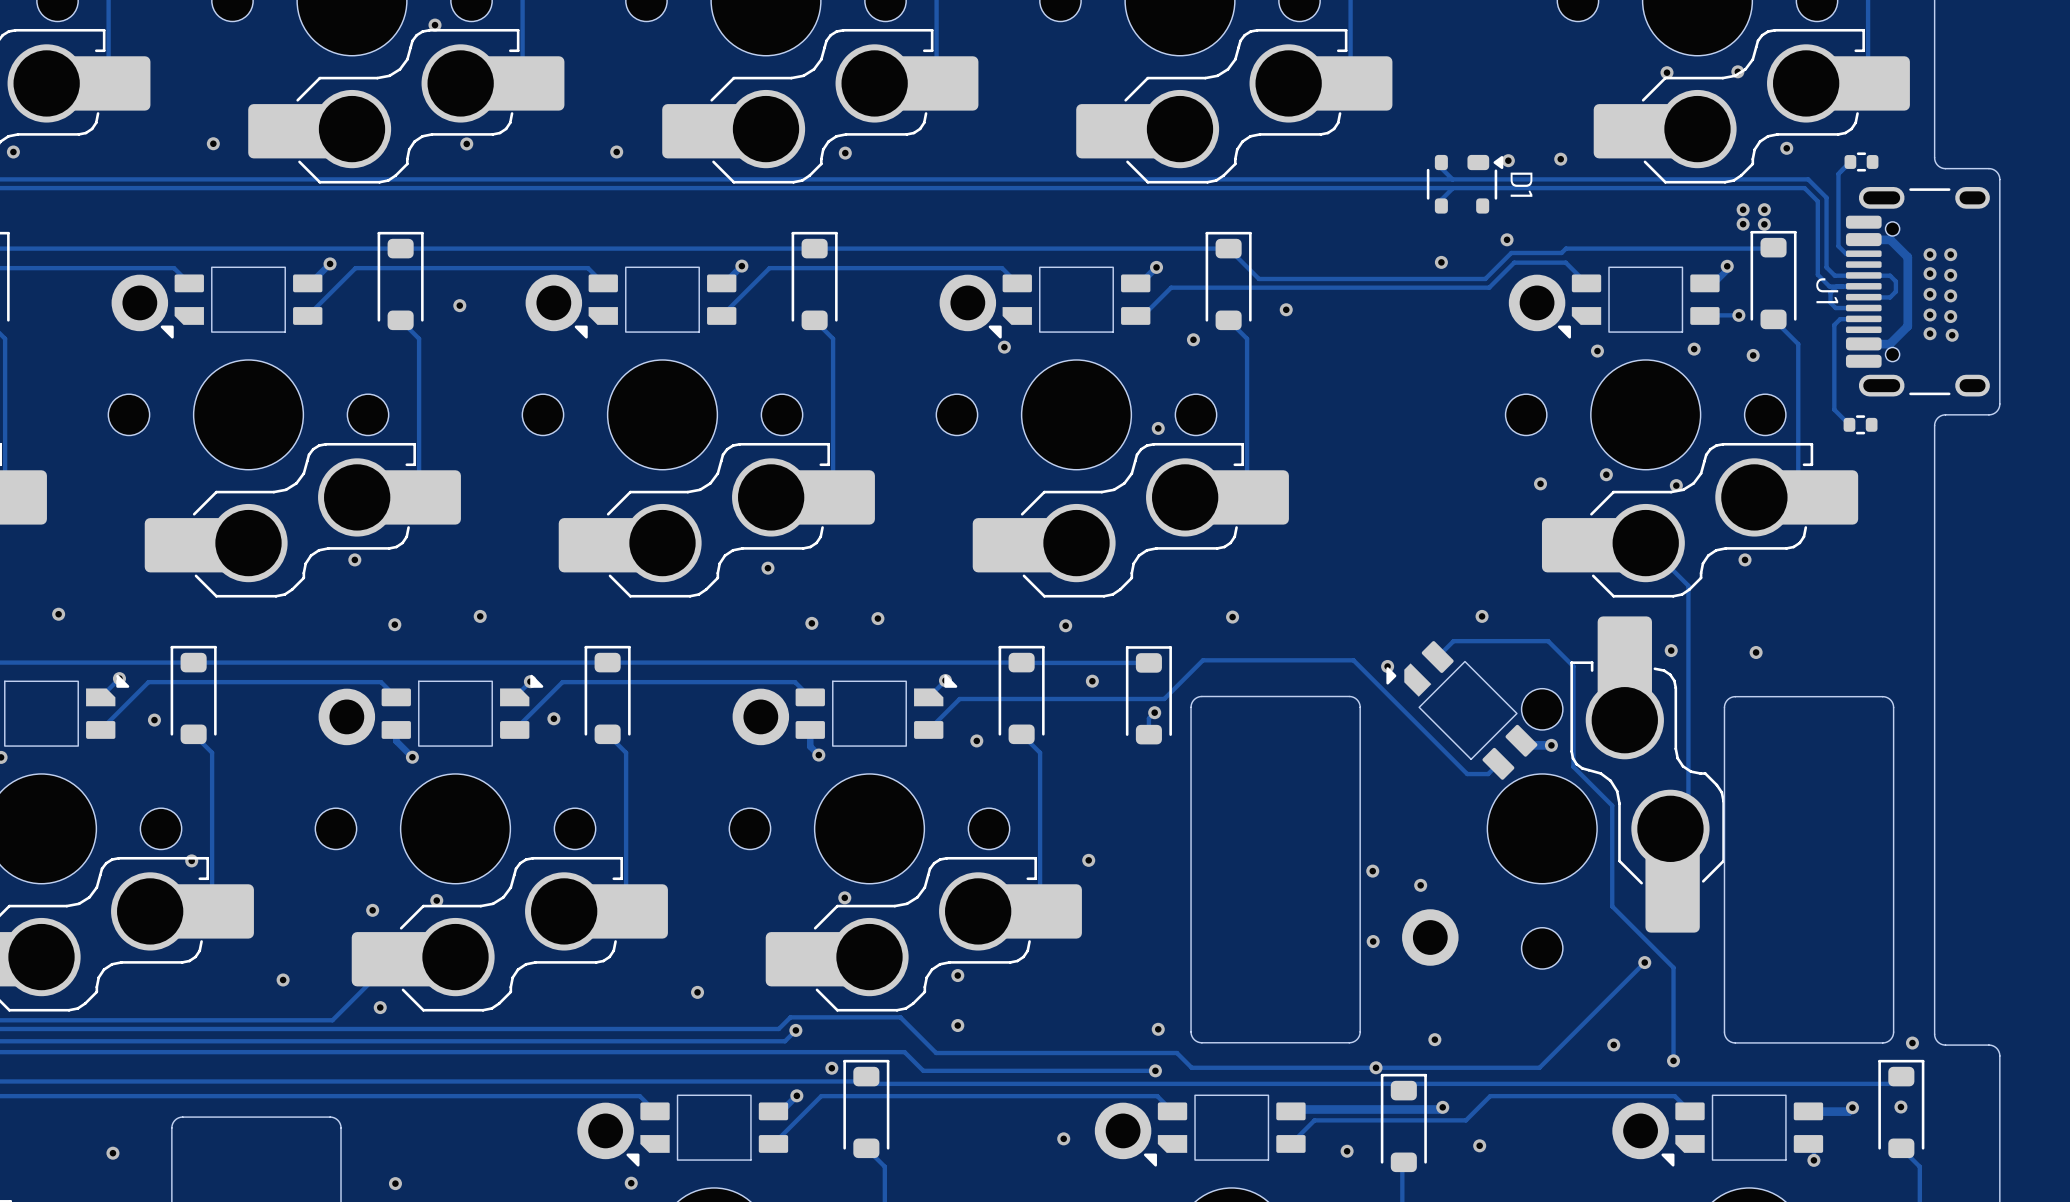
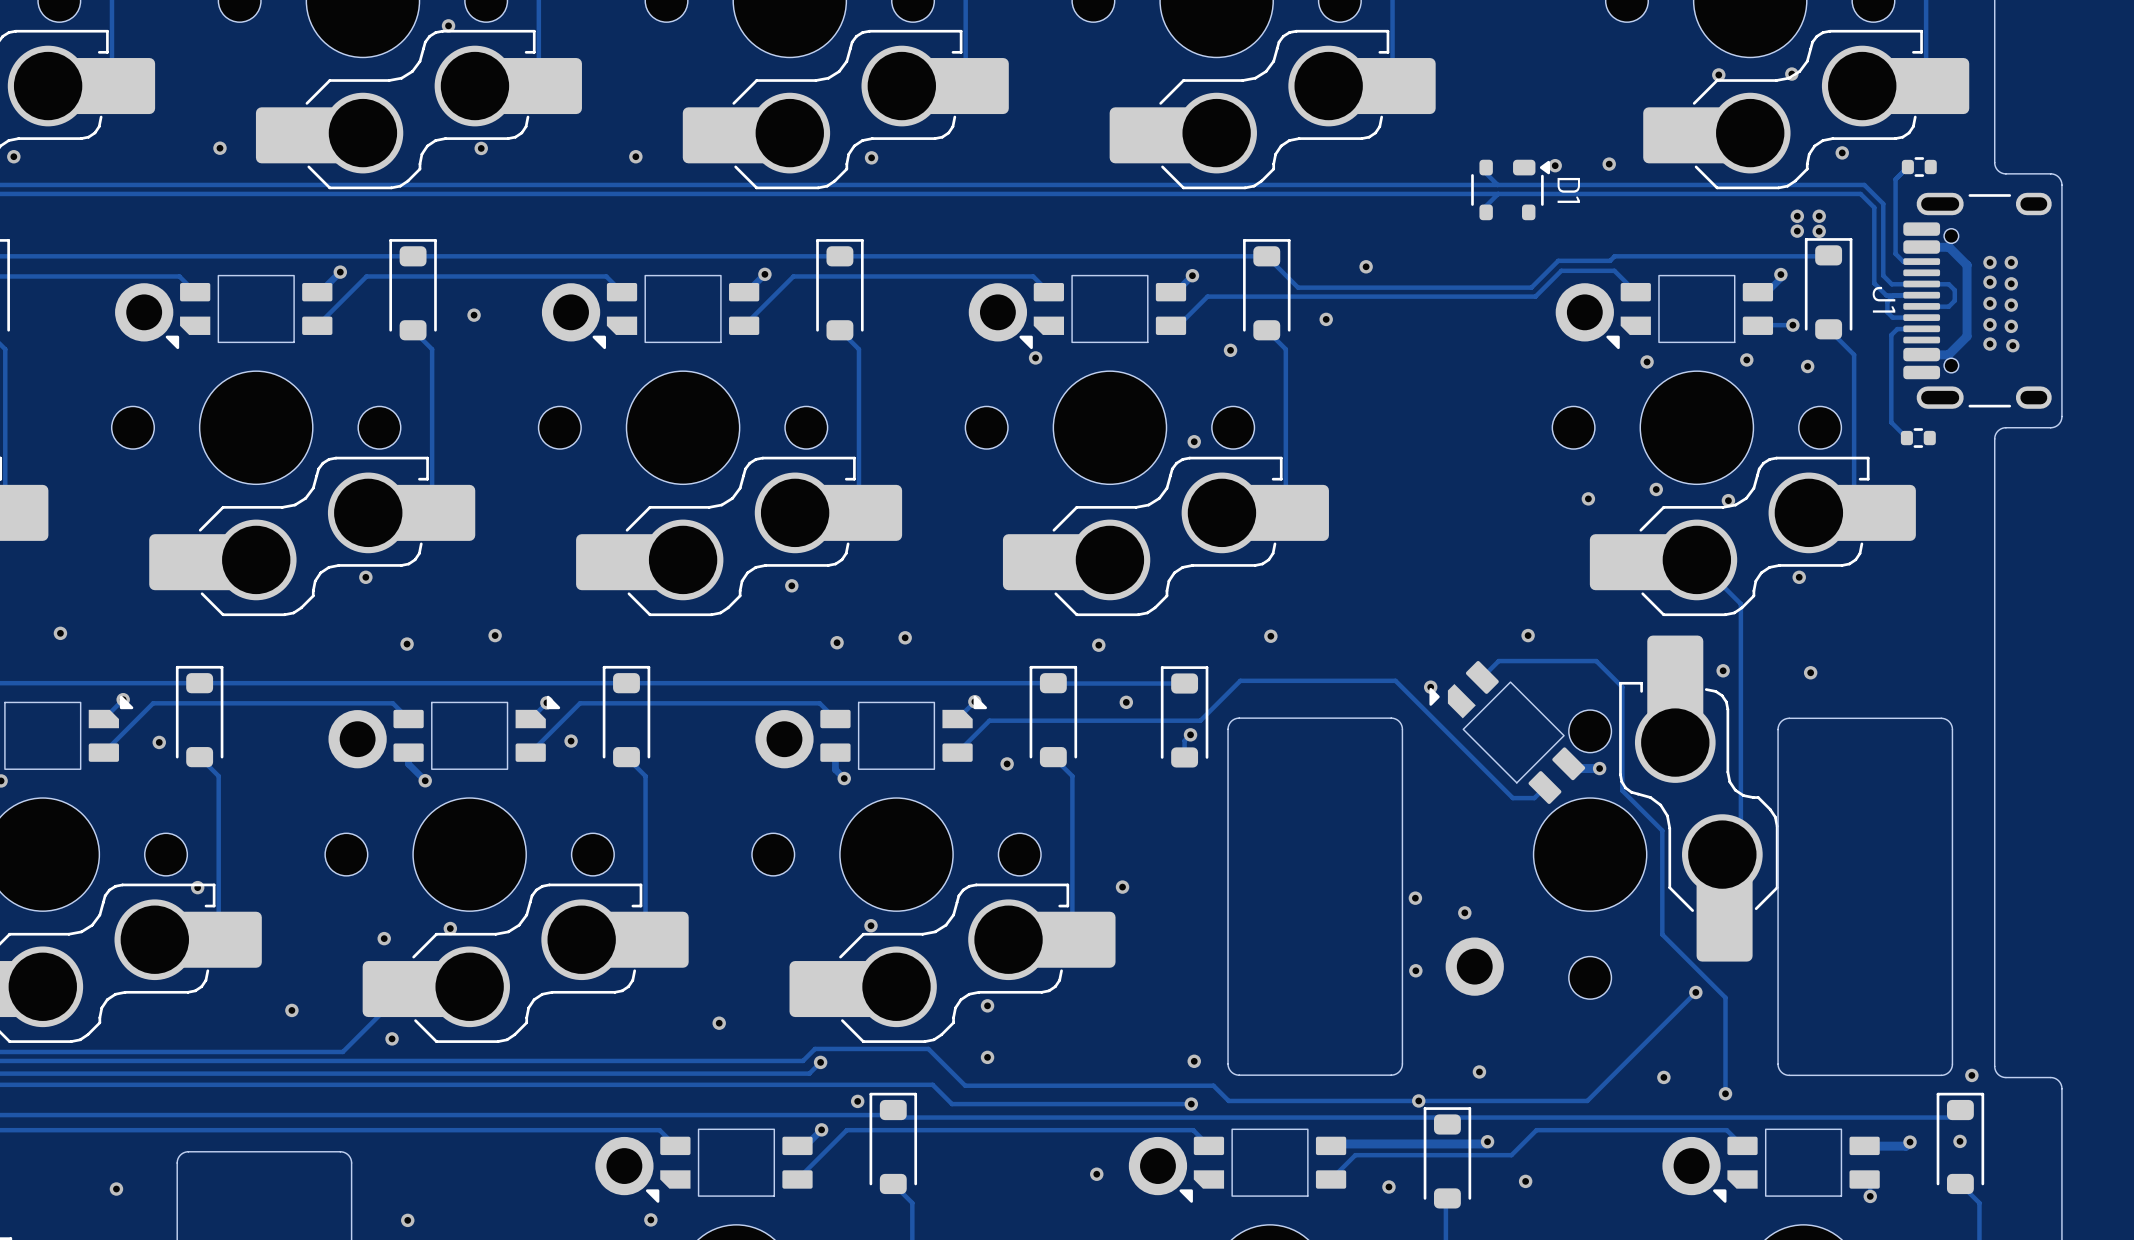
via: (1507, 239) -> none
via: none -> (1366, 266)
via: (1441, 262) -> none

